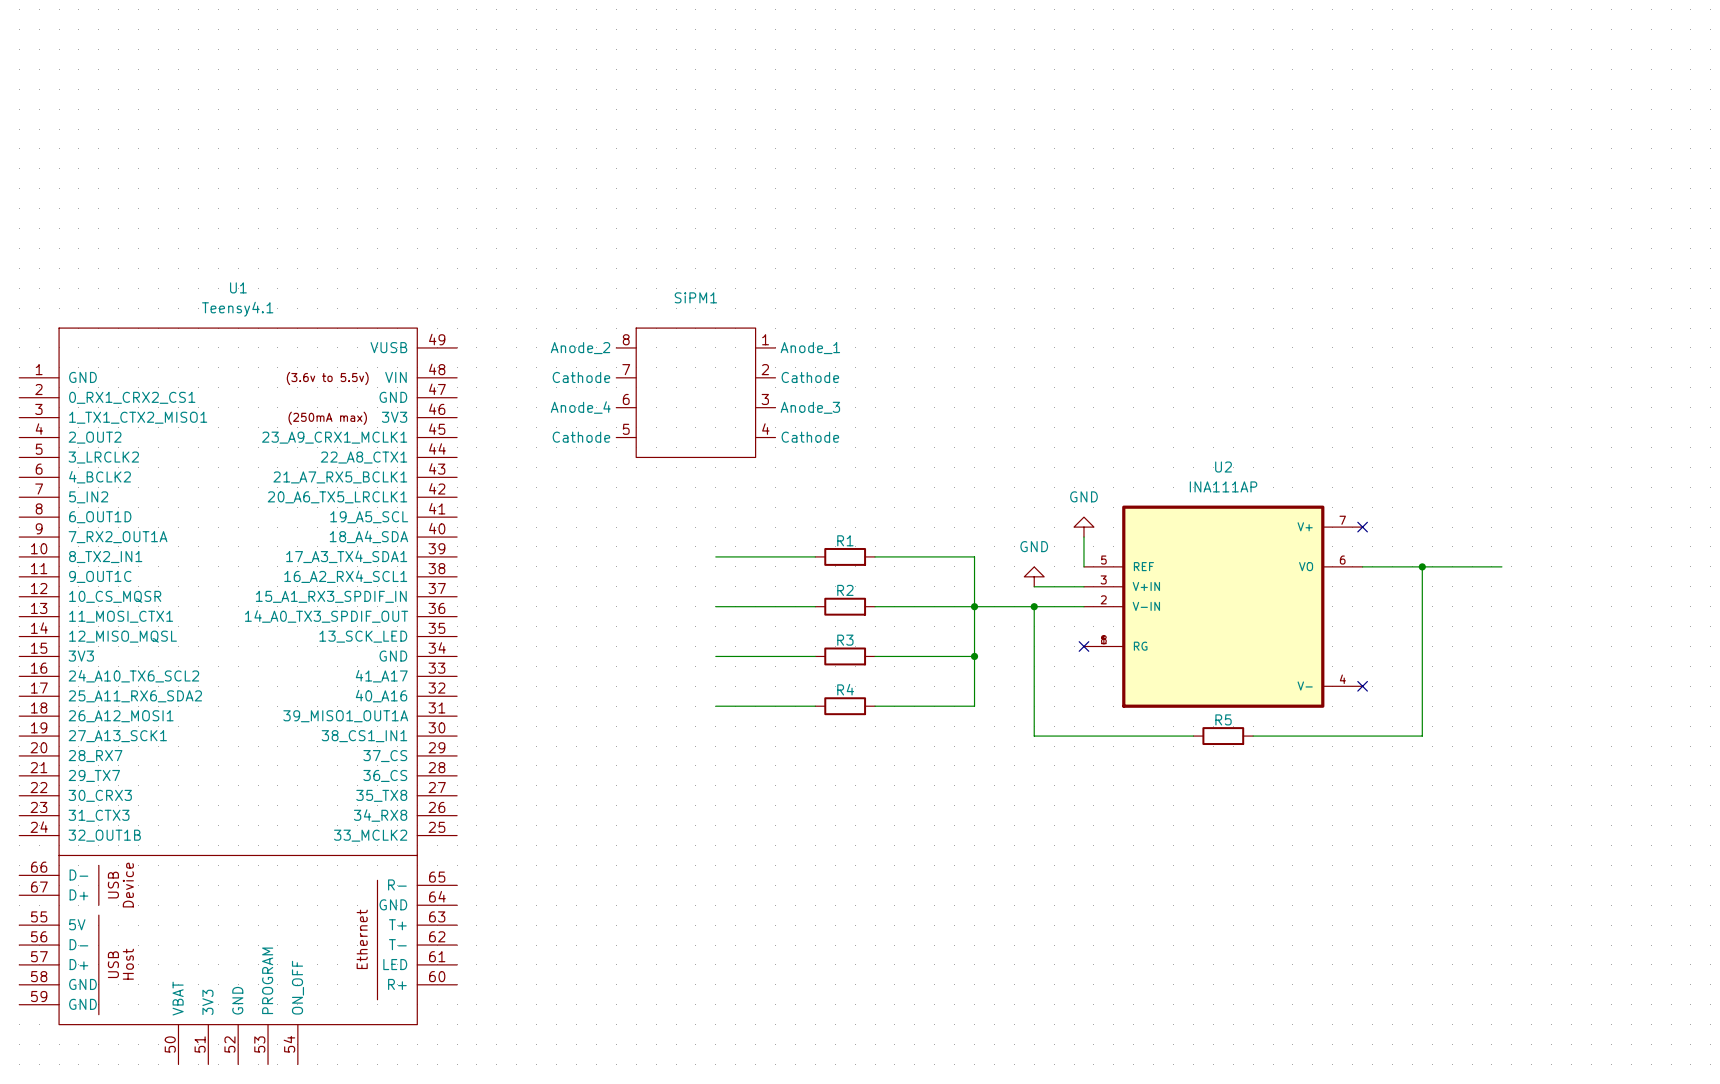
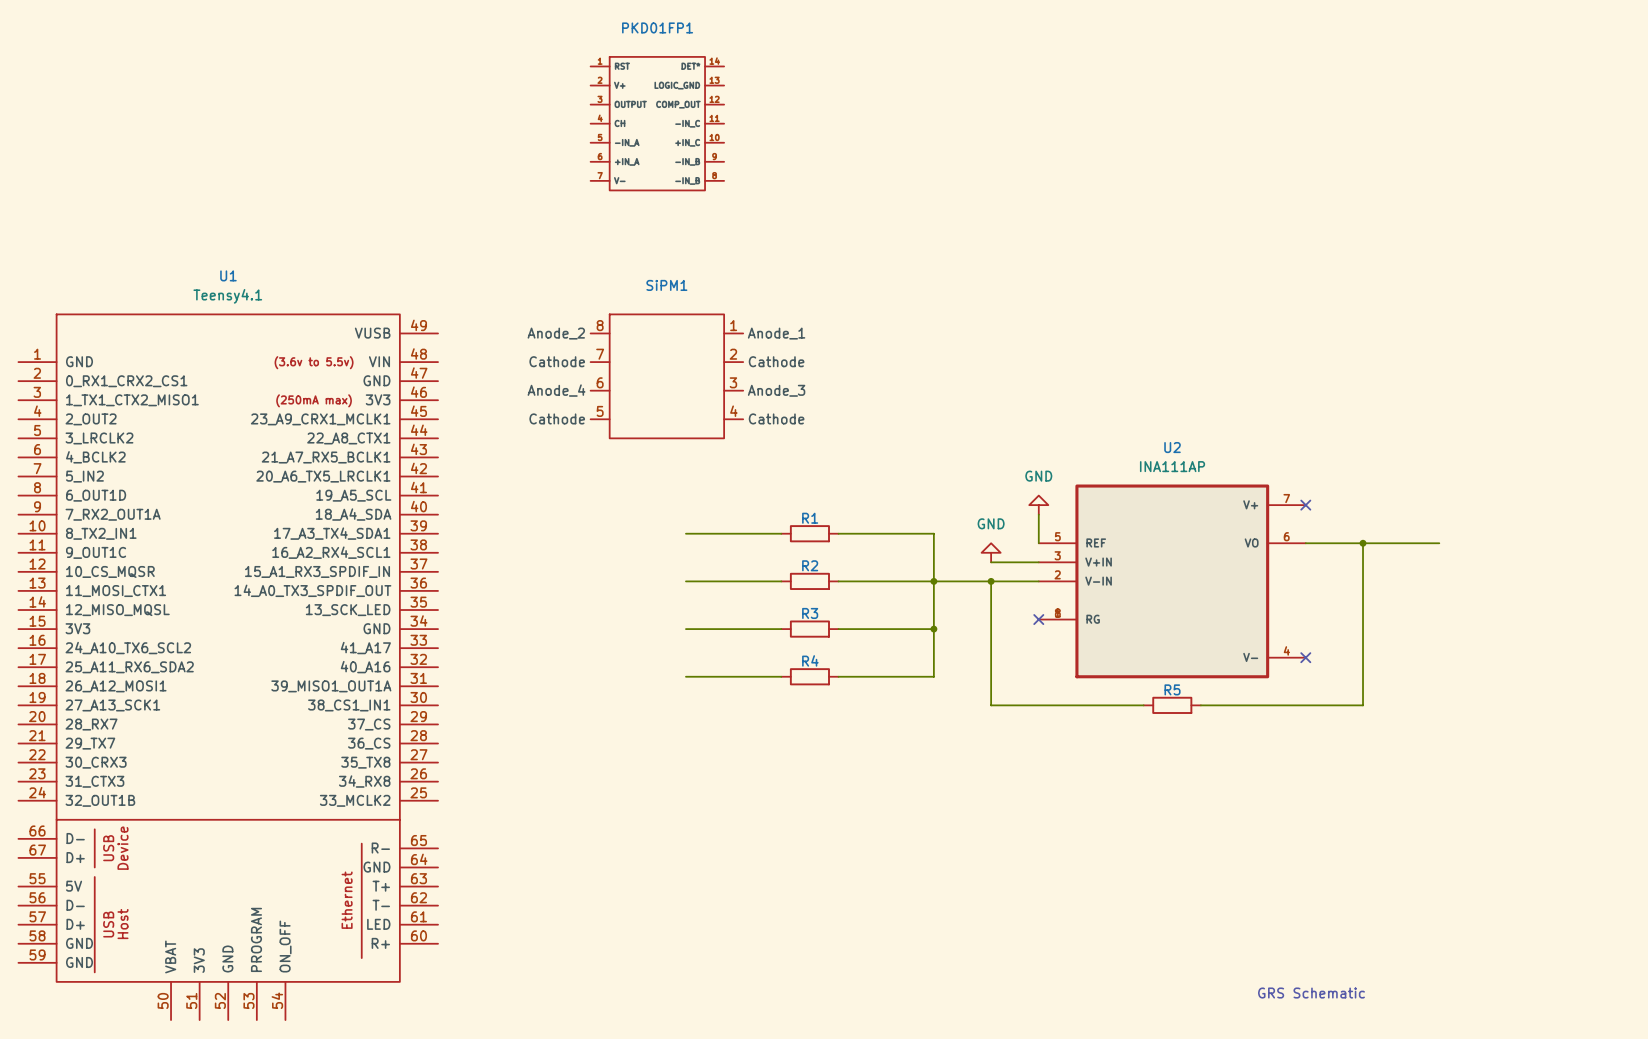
PKD01FP1: none -> (657, 123)
text: none -> GRS Schematic (1311, 993)

